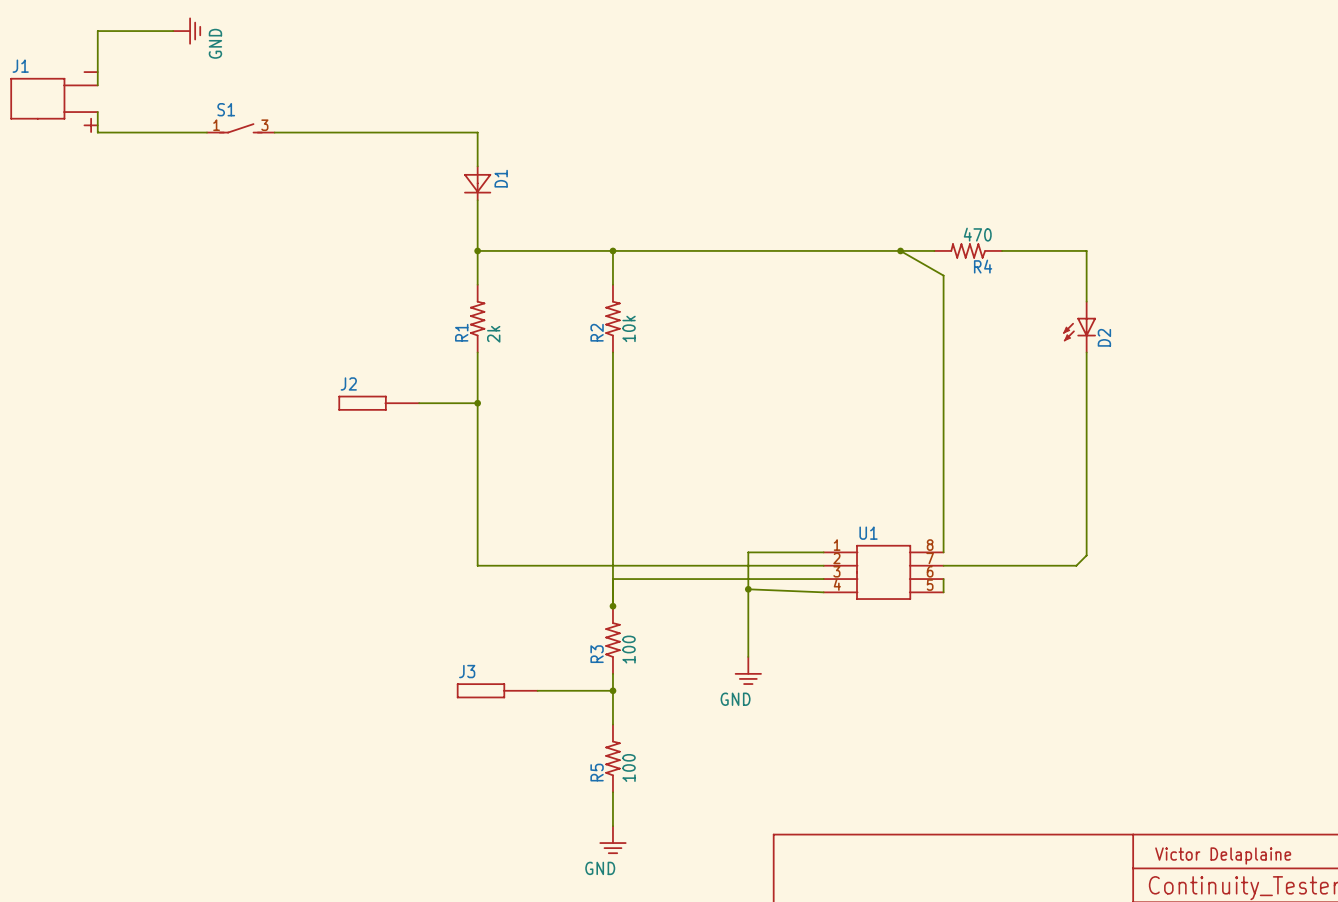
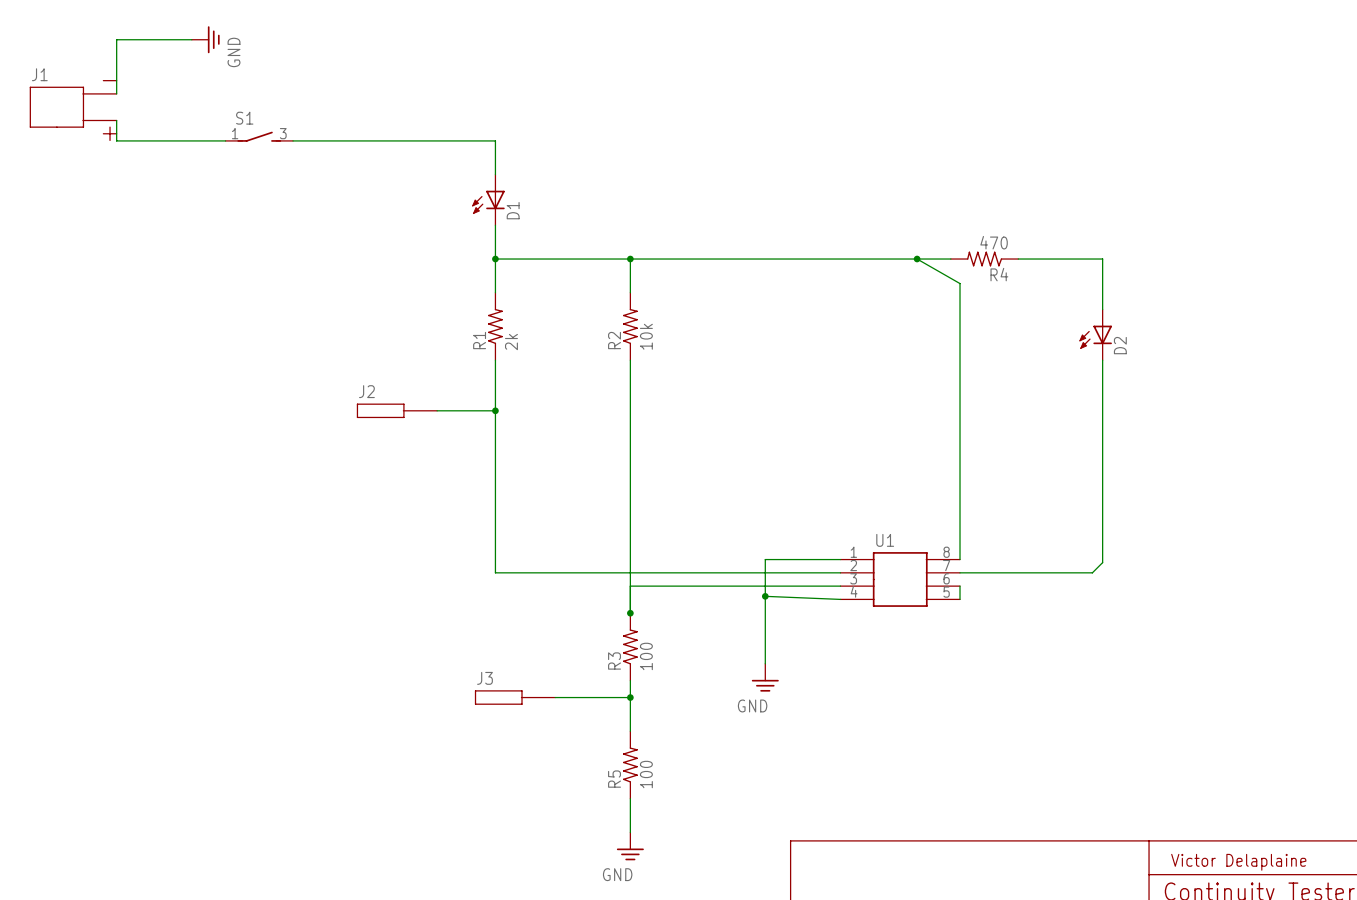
D1 symbol: [464, 166, 492, 201] -> [472, 174, 505, 226]

